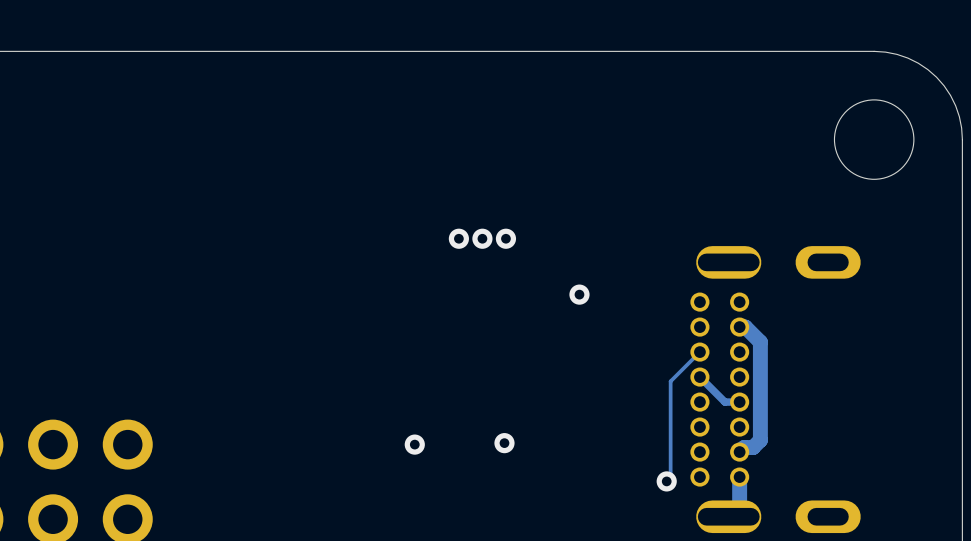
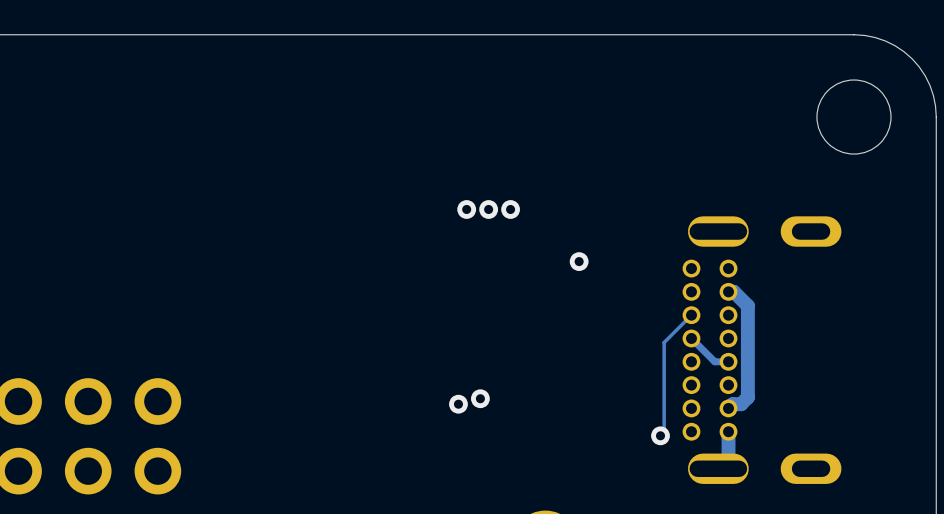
via: none -> (480, 398)
via: (504, 443) -> none
via: (414, 444) -> none
via: none -> (458, 404)

